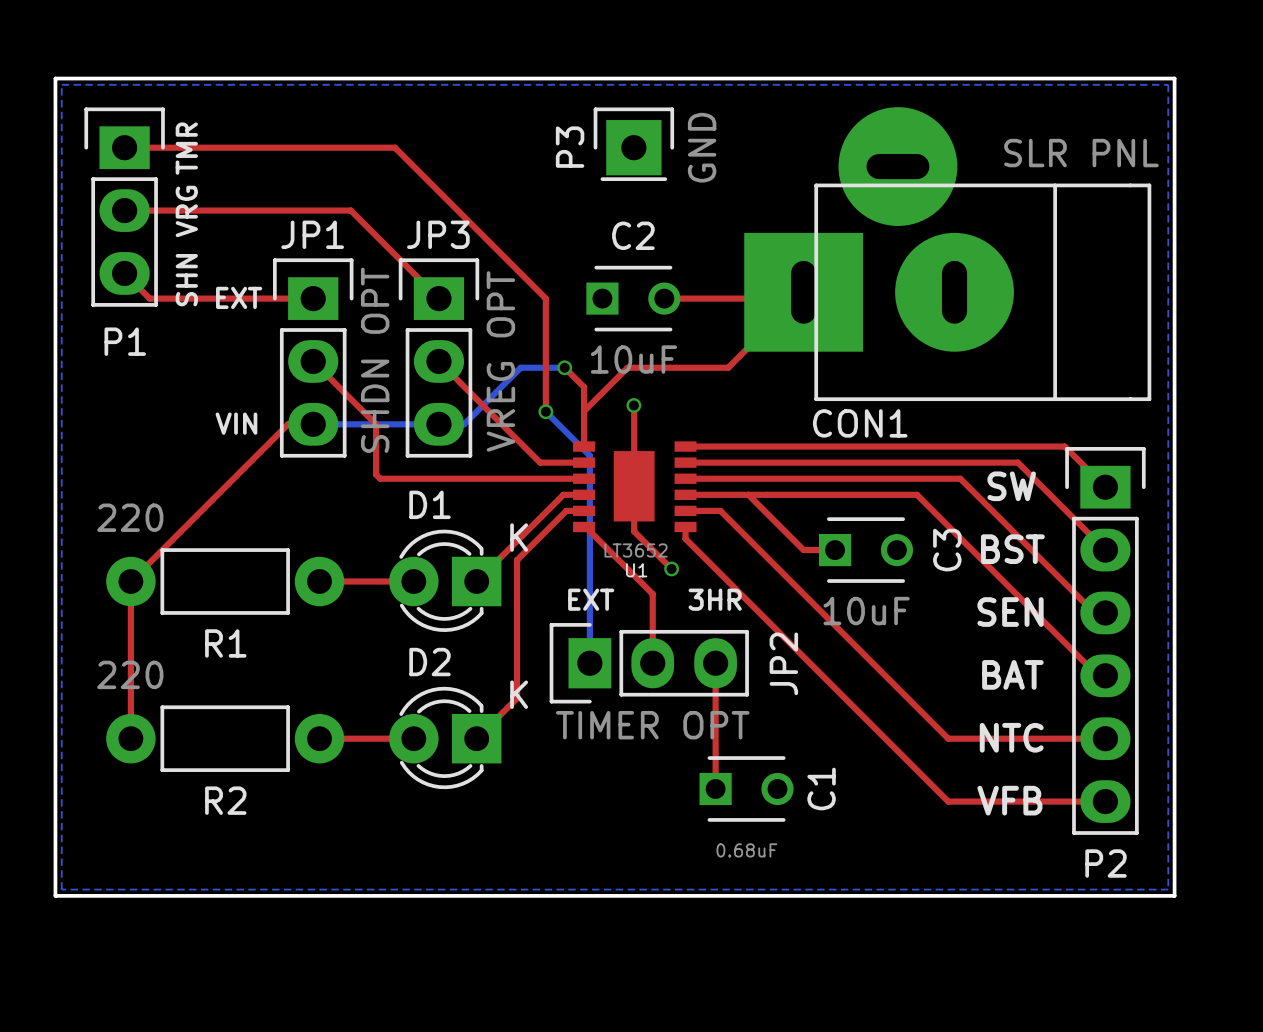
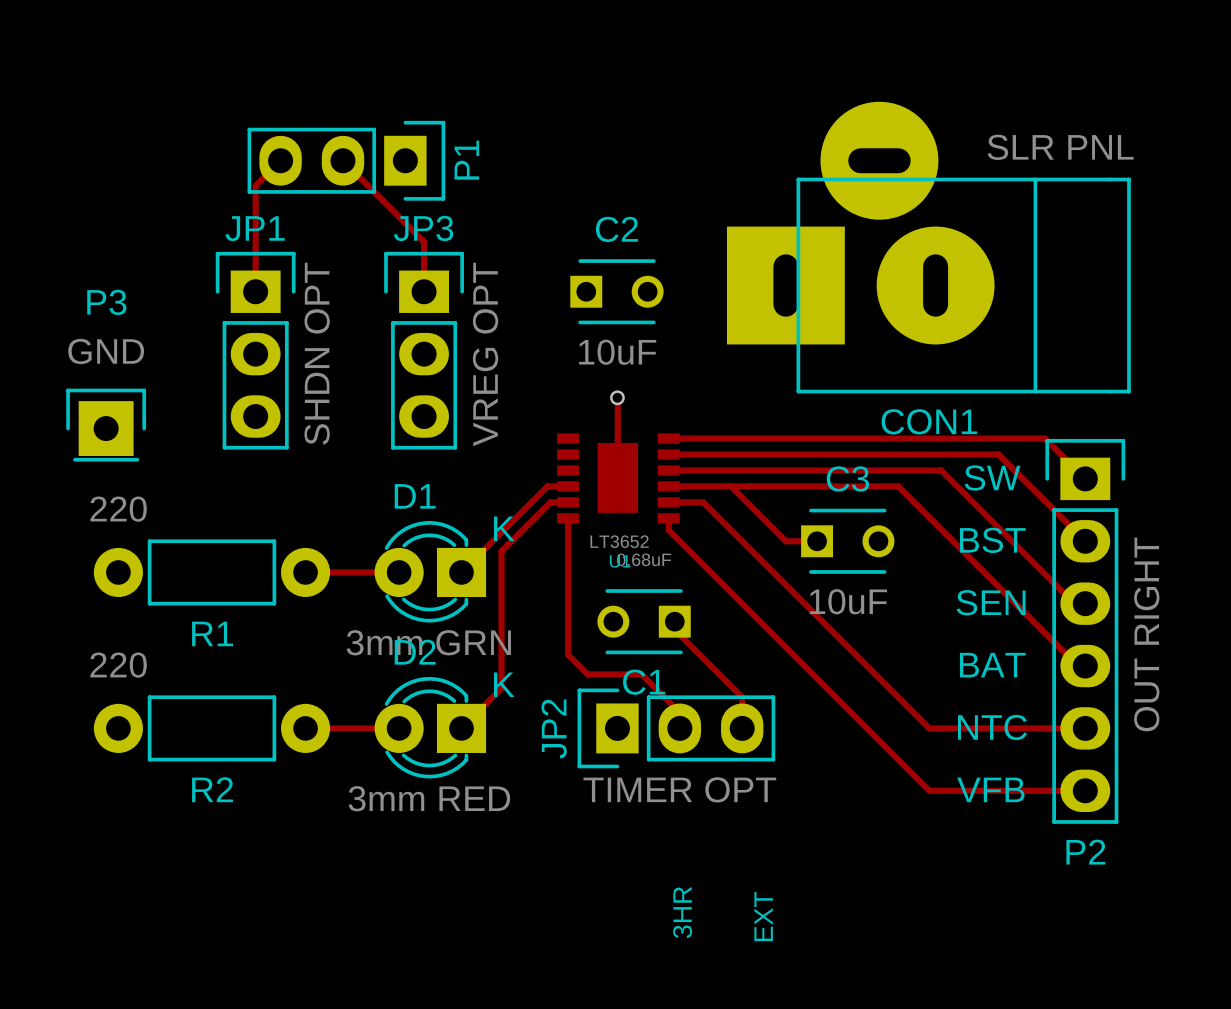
board edge: (55, 78) (1174, 78) (1174, 895) (55, 895) (55, 78) -> none
bottom zone outline: (61, 84) (61, 889) (1168, 889) (1168, 84) (61, 84) -> none
P3 position: (633, 144) -> (106, 425)
top track: (124, 147) (394, 147) (545, 298) (545, 411) -> none
P3 name rotation: 0° (570, 147) -> 90° clockwise (106, 302)
P3 name position: P3 (570, 147) -> P3 (106, 302)
P3 value rotation: 0° (702, 147) -> 90° clockwise (106, 351)
P3 value position: GND (702, 147) -> GND (106, 351)
text: TMR (186, 148) -> none
top track: none -> (280, 160) (255, 185) (255, 291)
P1 rotation: 0° (124, 207) -> 90° clockwise (346, 160)
P1 position: (124, 207) -> (346, 160)
top track: (124, 210) (350, 210) (438, 298) -> (342, 160) (424, 241) (424, 291)
text: VRG (186, 211) -> none
top track: (124, 273) (149, 298) (313, 298) -> none
text: SHN (186, 280) -> none
top track: (803, 292) (728, 367) (627, 367) (584, 411) -> none
text: EXT (239, 297) -> none
top track: (664, 298) (759, 298) -> none
P1 name position: P1 (125, 341) -> P1 (466, 160)
JP1 position: (313, 357) -> (255, 350)
top track: (313, 361) (376, 424) (376, 474) (380, 478) (584, 478) -> none
top track: (438, 361) (540, 462) (584, 462) -> none
top track: (564, 367) (584, 387) (584, 446) -> none
bottom track: (564, 367) (520, 367) (464, 424) (313, 424) -> none
via: (564, 367) -> none
bottom track: (545, 411) (589, 455) (589, 663) -> none
via: (545, 411) -> none
text: VIN (236, 423) -> none
CON1 name position: CON1 (860, 423) -> CON1 (929, 421)
top track: (313, 424) (288, 424) (130, 581) -> none
top track: (634, 486) (634, 531) (671, 568) -> none
top track: (584, 527) (652, 594) (652, 663) -> (568, 518) (568, 654) (587, 674) (641, 674) (679, 712) (679, 728)
C3 name rotation: 0° (947, 550) -> 90° clockwise (847, 478)
C3 name position: C3 (947, 550) -> C3 (847, 478)
top track: (130, 562) (130, 738) -> none
via: (671, 568) -> none
text rotation: 0° (591, 599) -> 90° counterclockwise (763, 916)
text position: EXT (591, 599) -> EXT (763, 916)
text rotation: 0° (715, 599) -> 90° counterclockwise (682, 912)
text position: 3HR (715, 599) -> 3HR (682, 912)
P2 value: none -> OUT RIGHT (1146, 634)
top track: none -> (679, 634) (742, 697) (742, 728)
D1 value: none -> 3mm GRN (428, 642)
JP2 position: (649, 663) -> (676, 728)
top track: (715, 663) (715, 788) -> none
JP2 name position: JP2 (783, 663) -> JP2 (554, 729)
C1 rotation: 0° (746, 788) -> 180° (644, 621)
C1 position: (746, 788) -> (644, 621)
C1 name position: C1 (821, 788) -> C1 (644, 682)
D2 value: none -> 3mm RED (429, 798)

